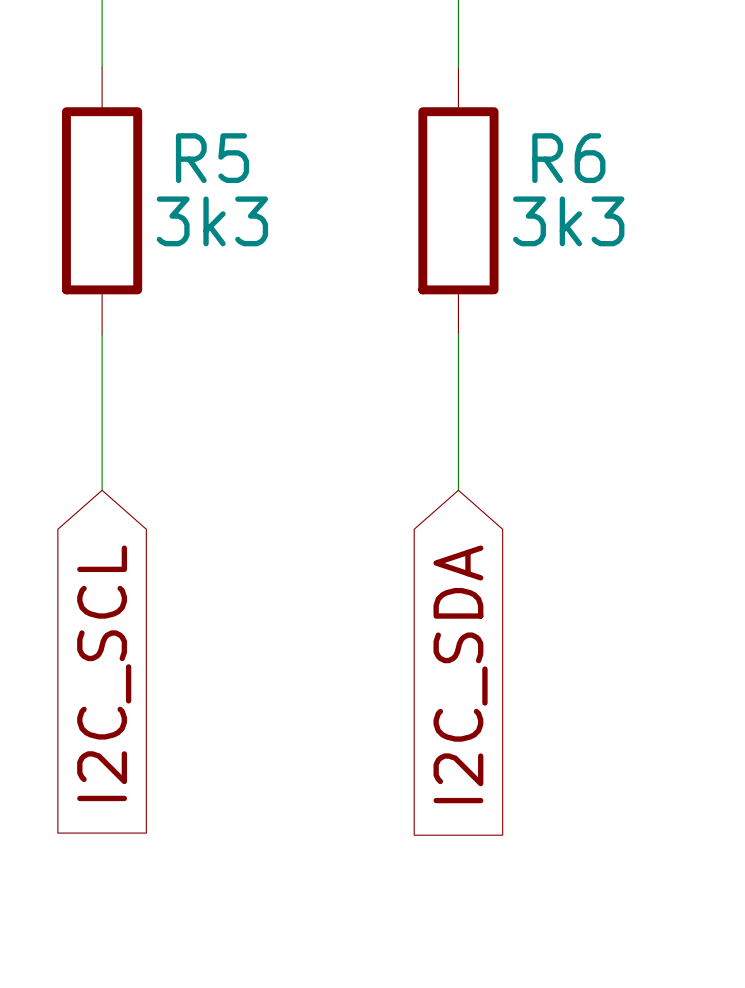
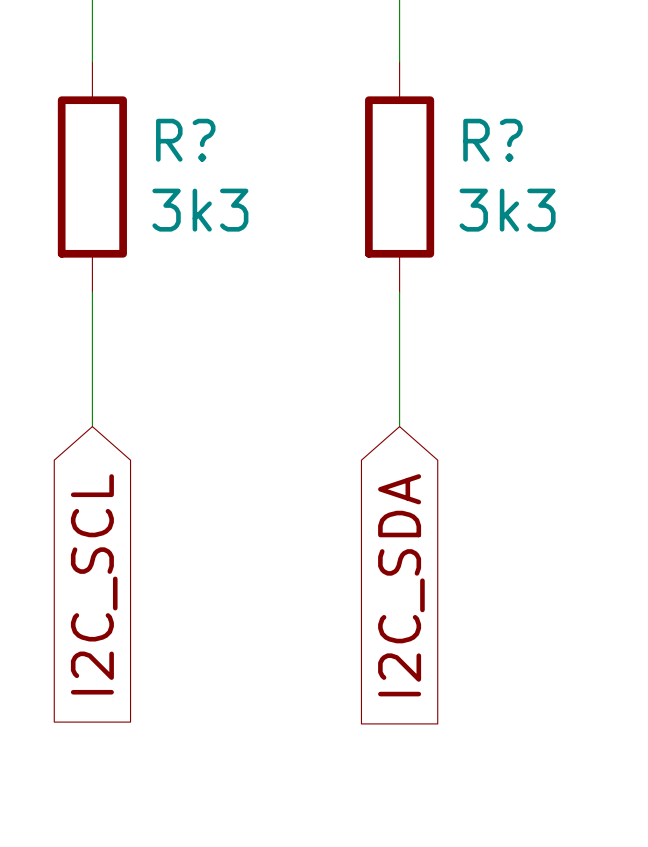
R5 name: R5 (212, 158) -> R? (185, 140)
R6 name: R6 (568, 158) -> R? (492, 140)
R5 text: 3k3 (212, 221) -> none
R6 text: 3k3 (568, 221) -> none
R5 value: none -> 3k3 (200, 210)
R6 value: none -> 3k3 (507, 210)

